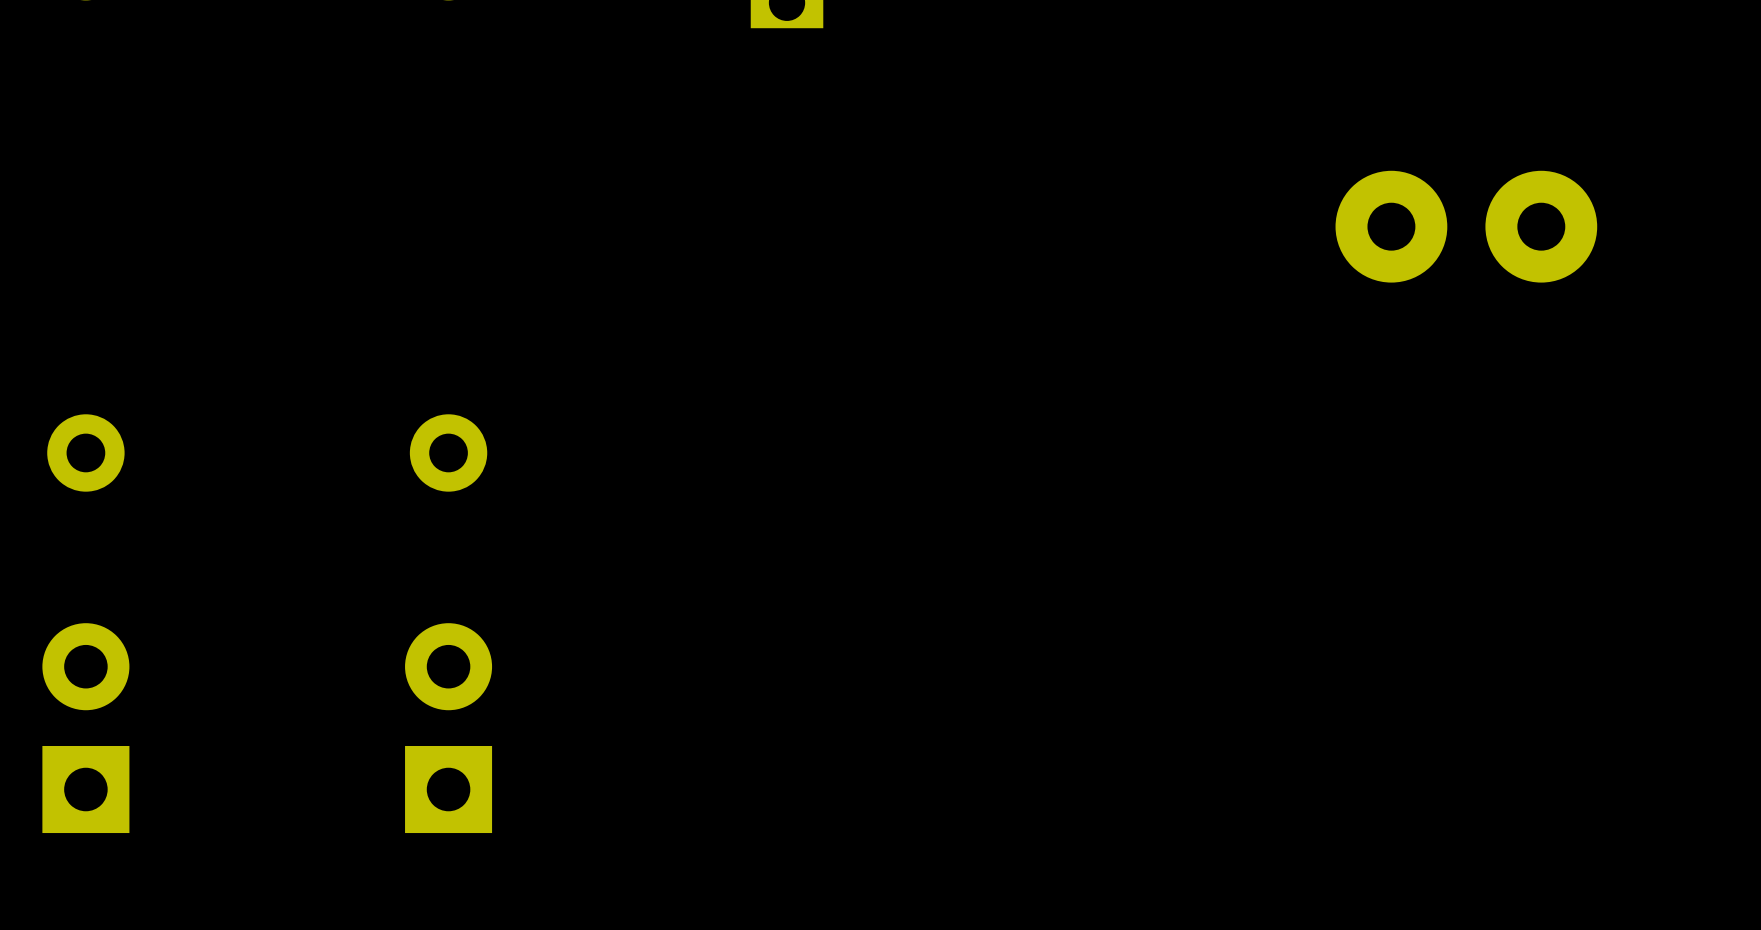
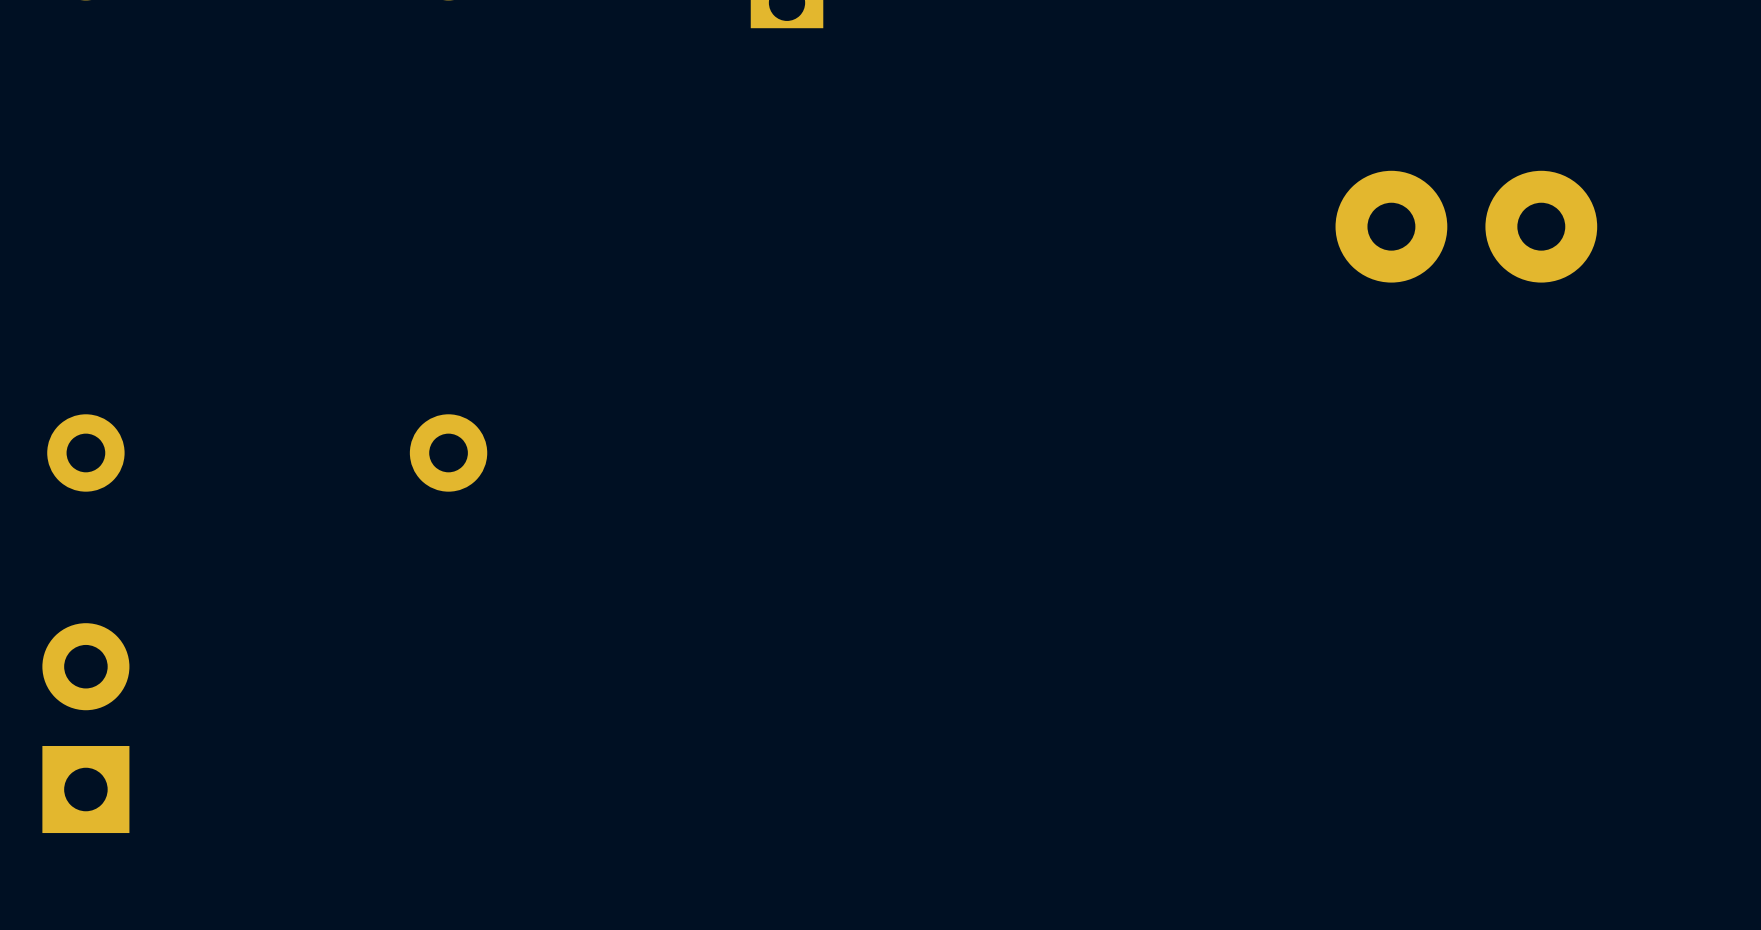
part: (448, 728) -> none

